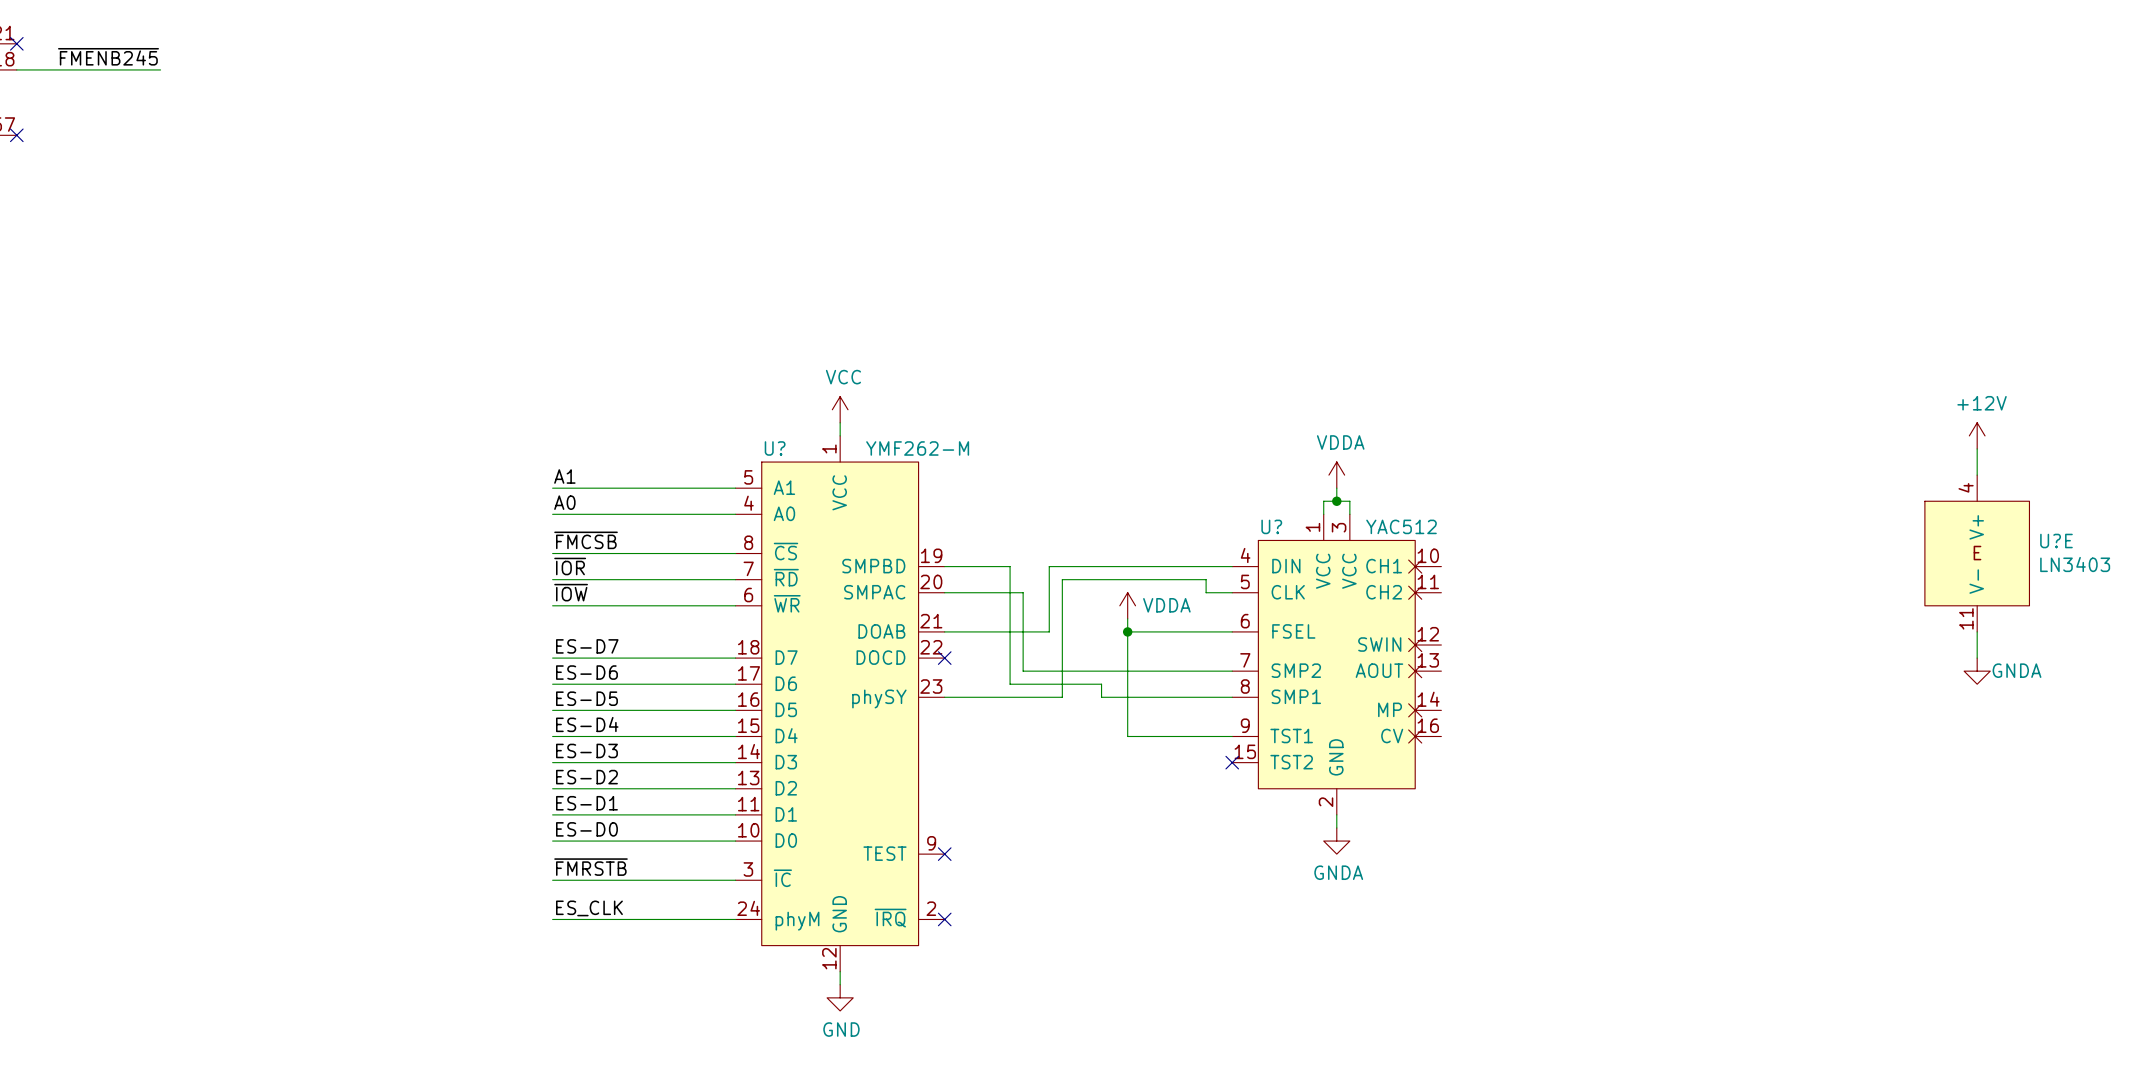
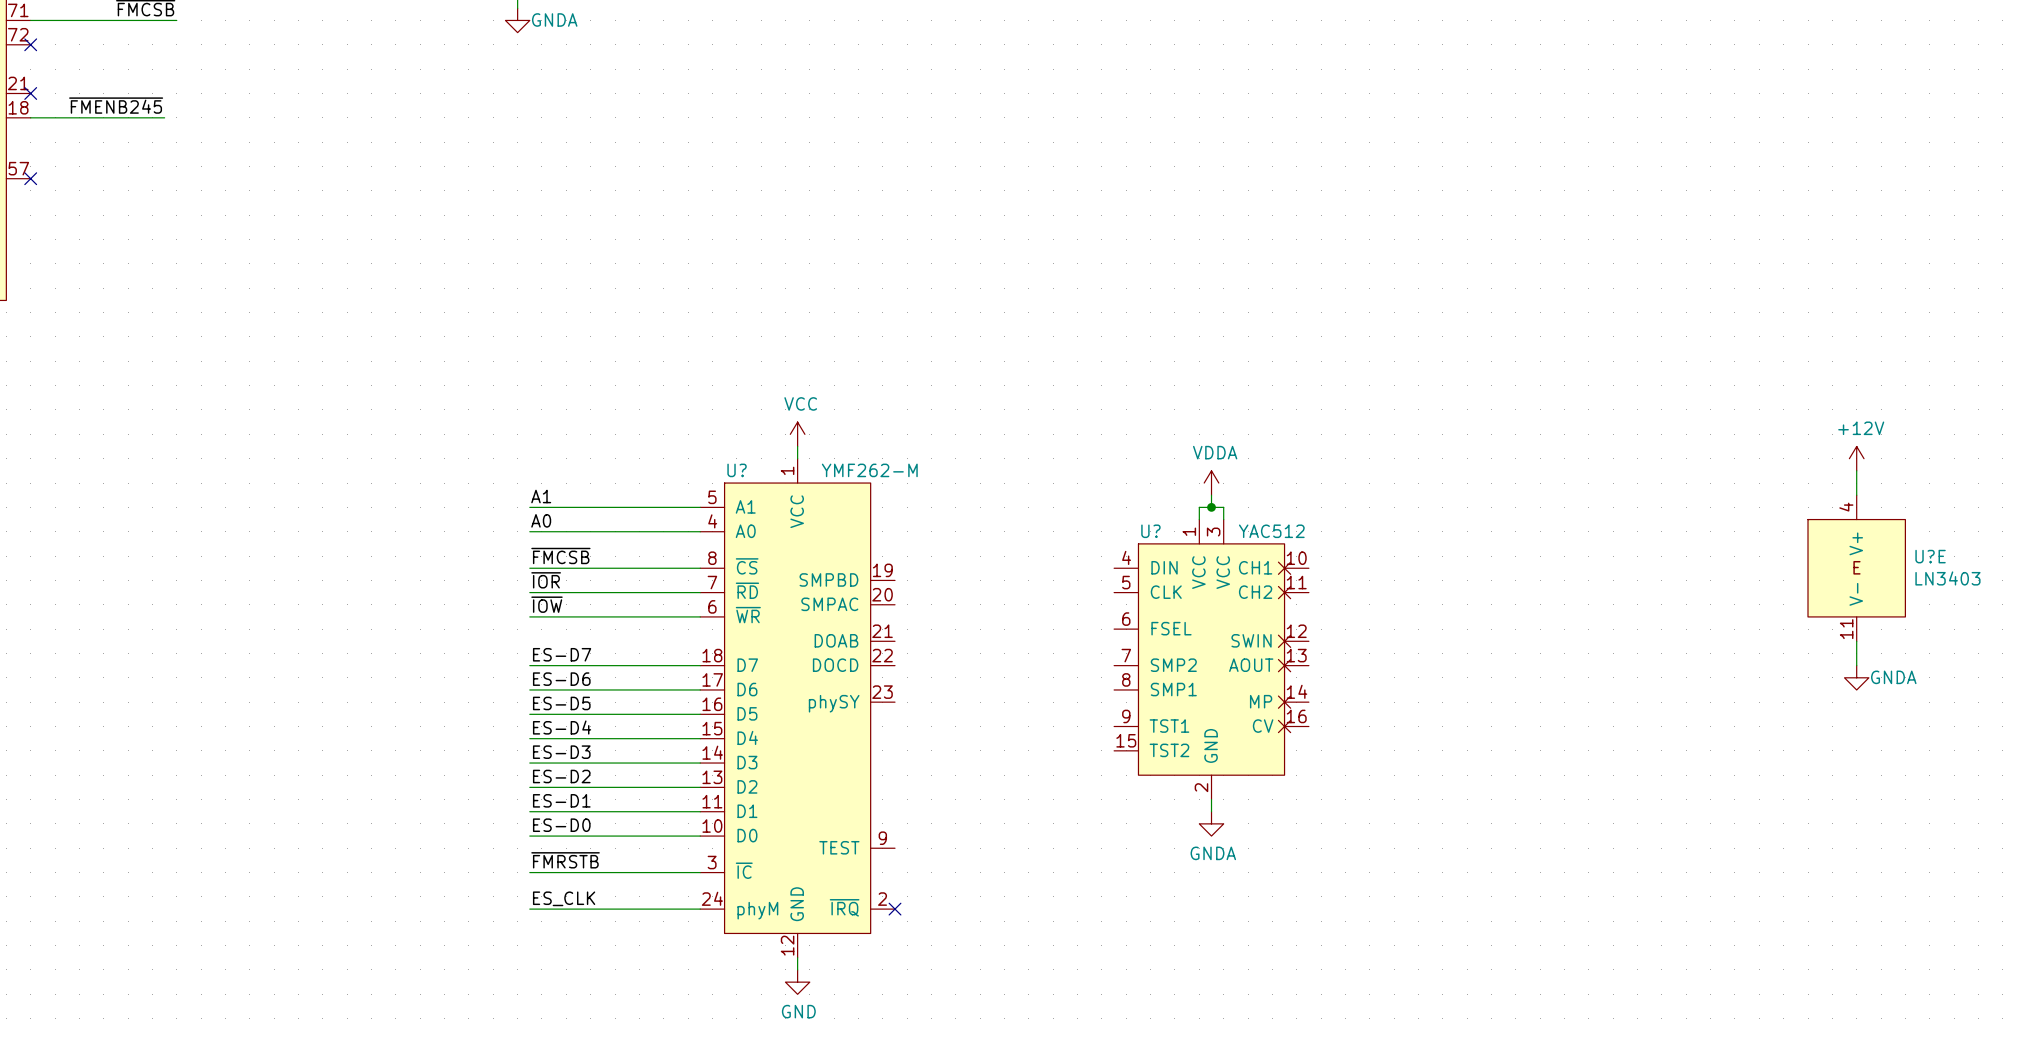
power symbol position: VDDA (1336, 475) -> VDDA (1211, 483)
wire: (1336, 488) (1336, 501) -> (1211, 495) (1211, 507)
junction position: (1336, 501) -> (1211, 507)
wire: (1323, 514) (1323, 501) (1349, 501) (1349, 514) -> (1199, 519) (1199, 507) (1223, 507) (1223, 519)
wire: (944, 566) (1010, 566) (1010, 684) (1101, 684) (1101, 697) (1232, 697) -> none
wire: (1232, 566) (1049, 566) (1049, 631) (944, 631) -> none
wire: (944, 592) (1023, 592) (1023, 671) (1232, 671) -> none
wire: (1232, 592) (1206, 592) (1206, 579) (1062, 579) (1062, 697) (944, 697) -> none
power symbol: VDDA (1127, 605) -> none
wire: (1127, 618) (1127, 736) (1232, 736) -> none
wire: (1127, 631) (1232, 631) -> none
junction: (1127, 631) -> none
no-connect mark: (944, 658) -> none
U? position: (1336, 664) -> (1211, 659)
no-connect mark: (1232, 762) -> none
wire: (1336, 814) (1336, 827) -> (1211, 799) (1211, 811)
power symbol position: GNDA (1336, 841) -> GNDA (1211, 823)
no-connect mark: (944, 854) -> none

